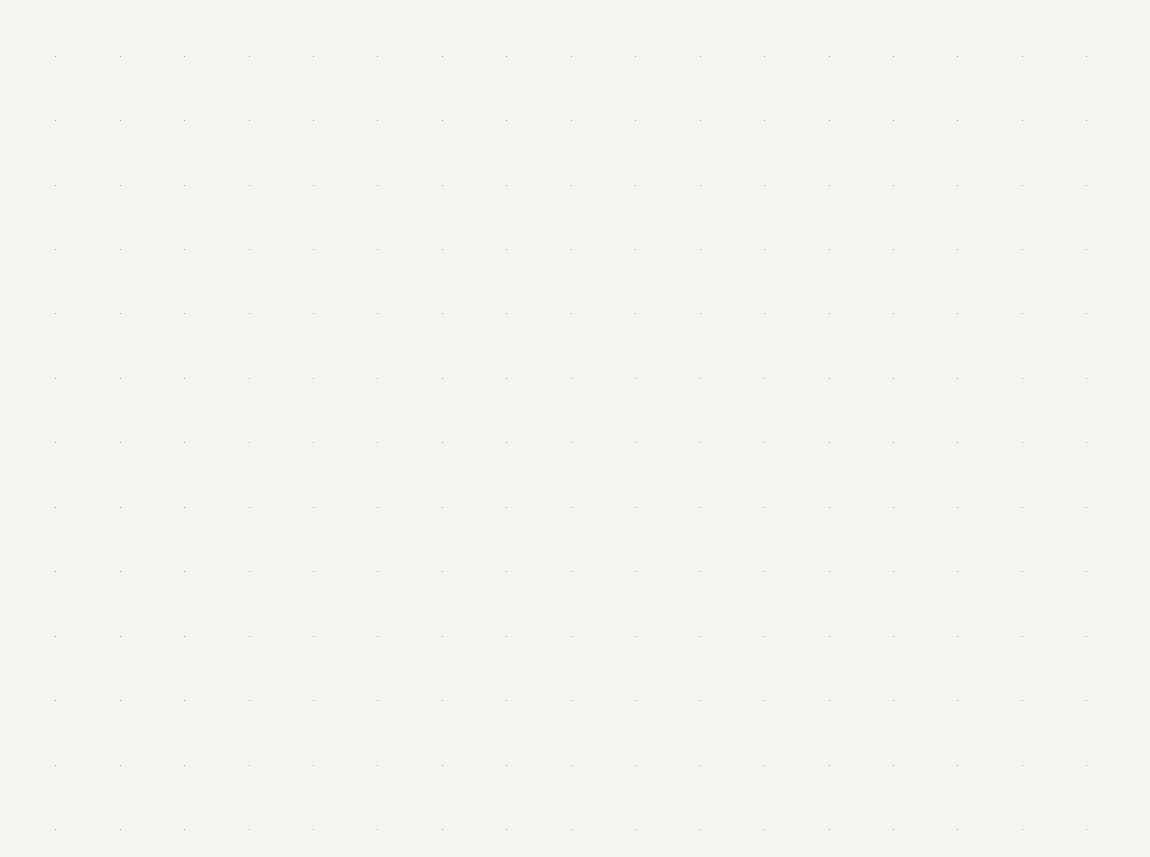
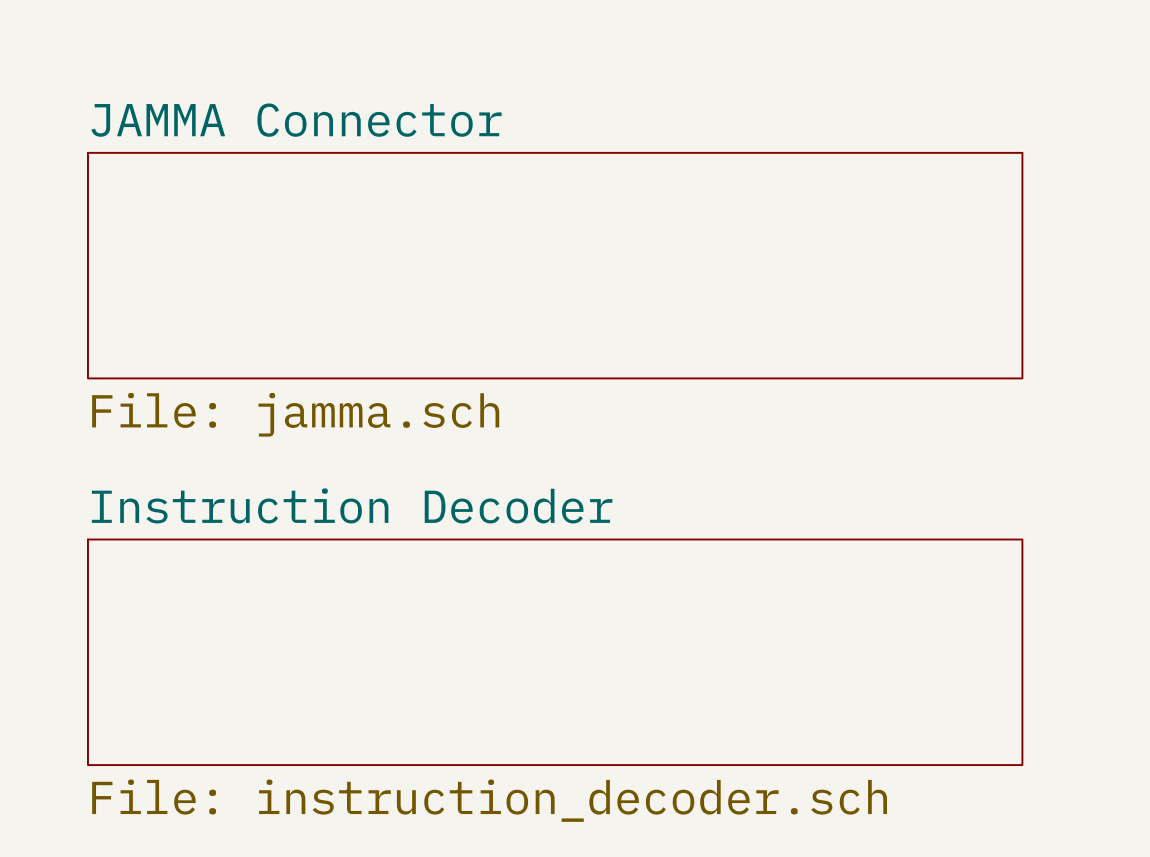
sheet JAMMA Connector: none -> File: jamma.sch (555, 265)
sheet Instruction Decoder: none -> File: instruction_decoder.sch (555, 652)

